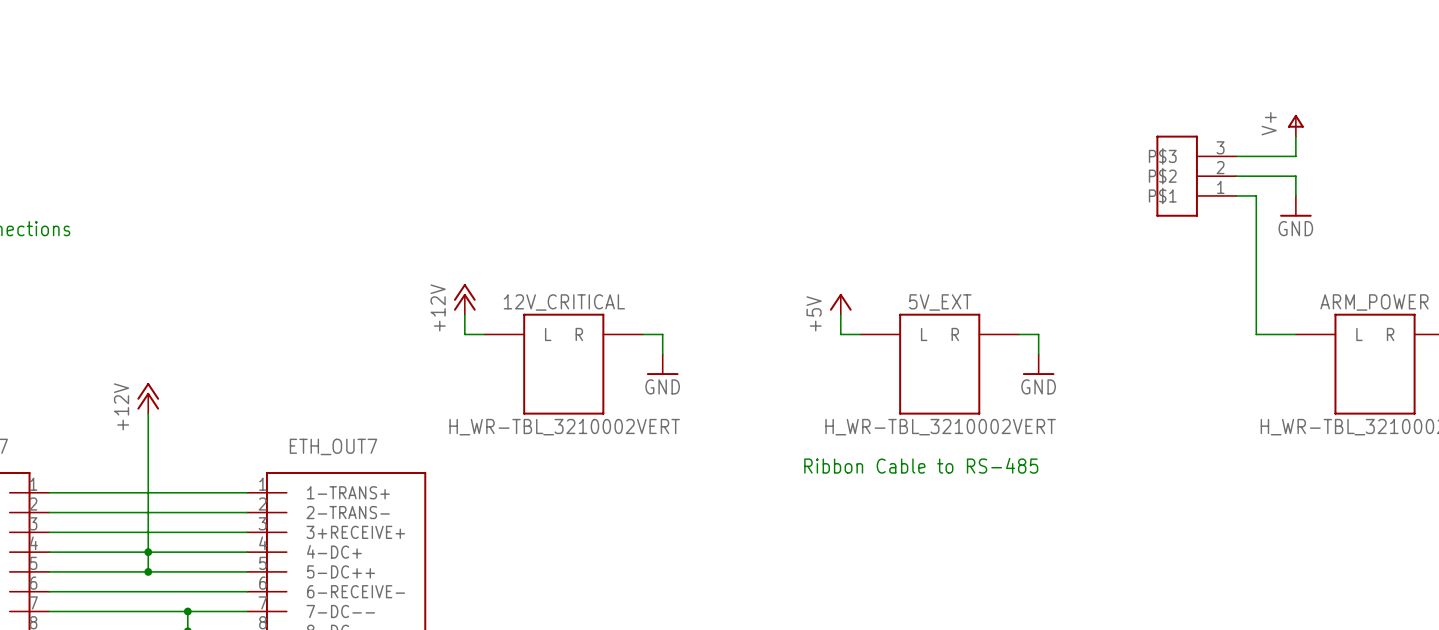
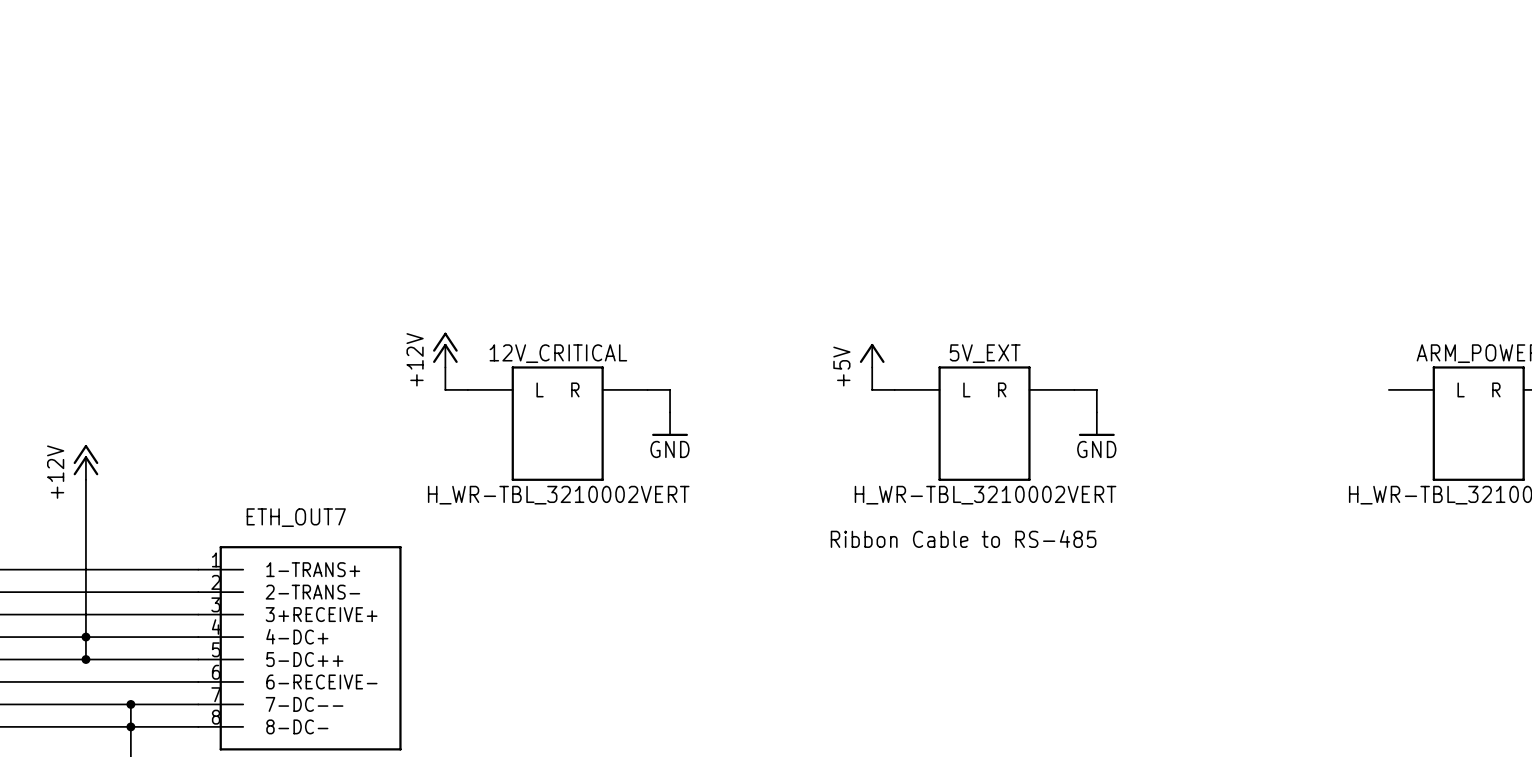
power symbol: V+ (1295, 125) -> none
wire: (1295, 136) (1295, 156) (1236, 156) -> none
part: (1196, 176) -> none
wire: (1236, 176) (1295, 176) (1295, 195) -> none
wire: (1236, 195) (1256, 195) (1256, 334) (1295, 334) -> none
power symbol: GND (1295, 206) -> none

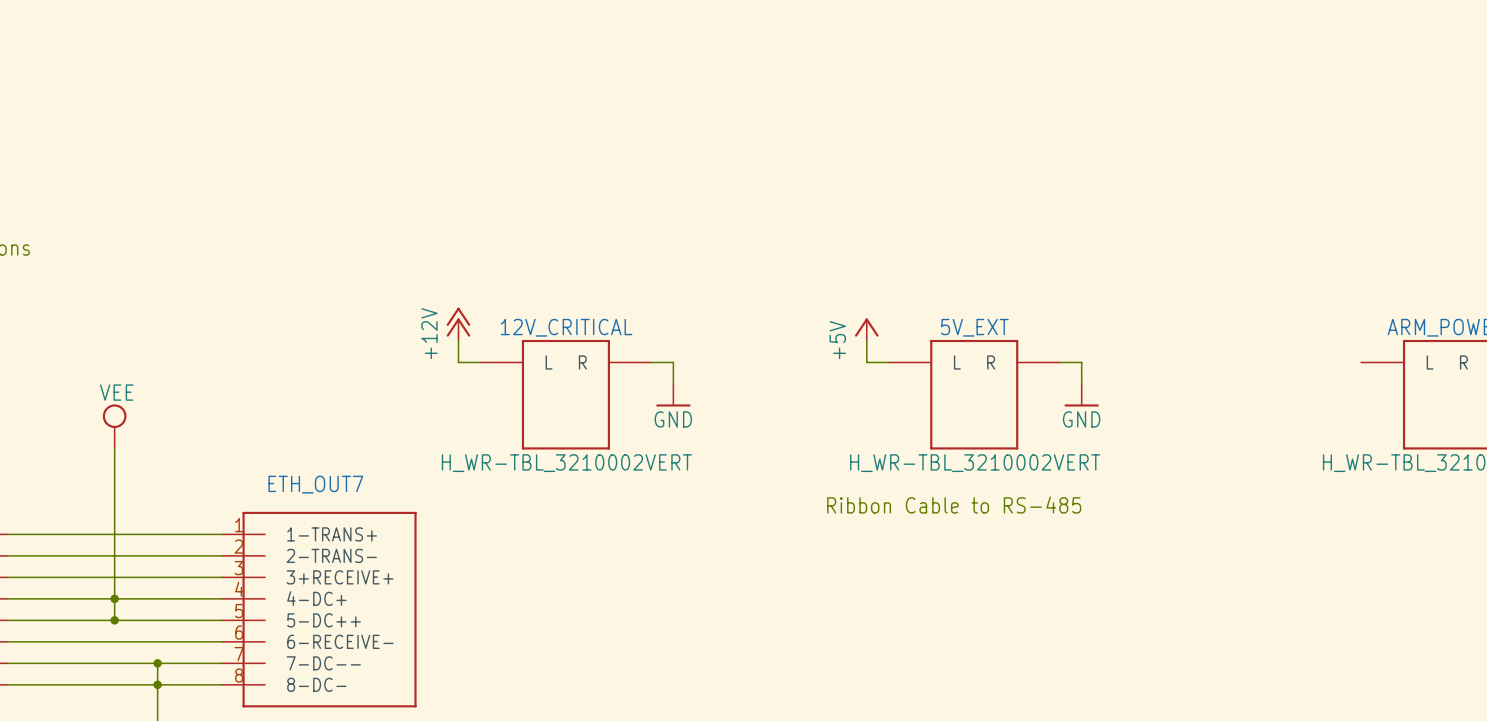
power symbol: +12V (85, 462) -> VEE (114, 426)

